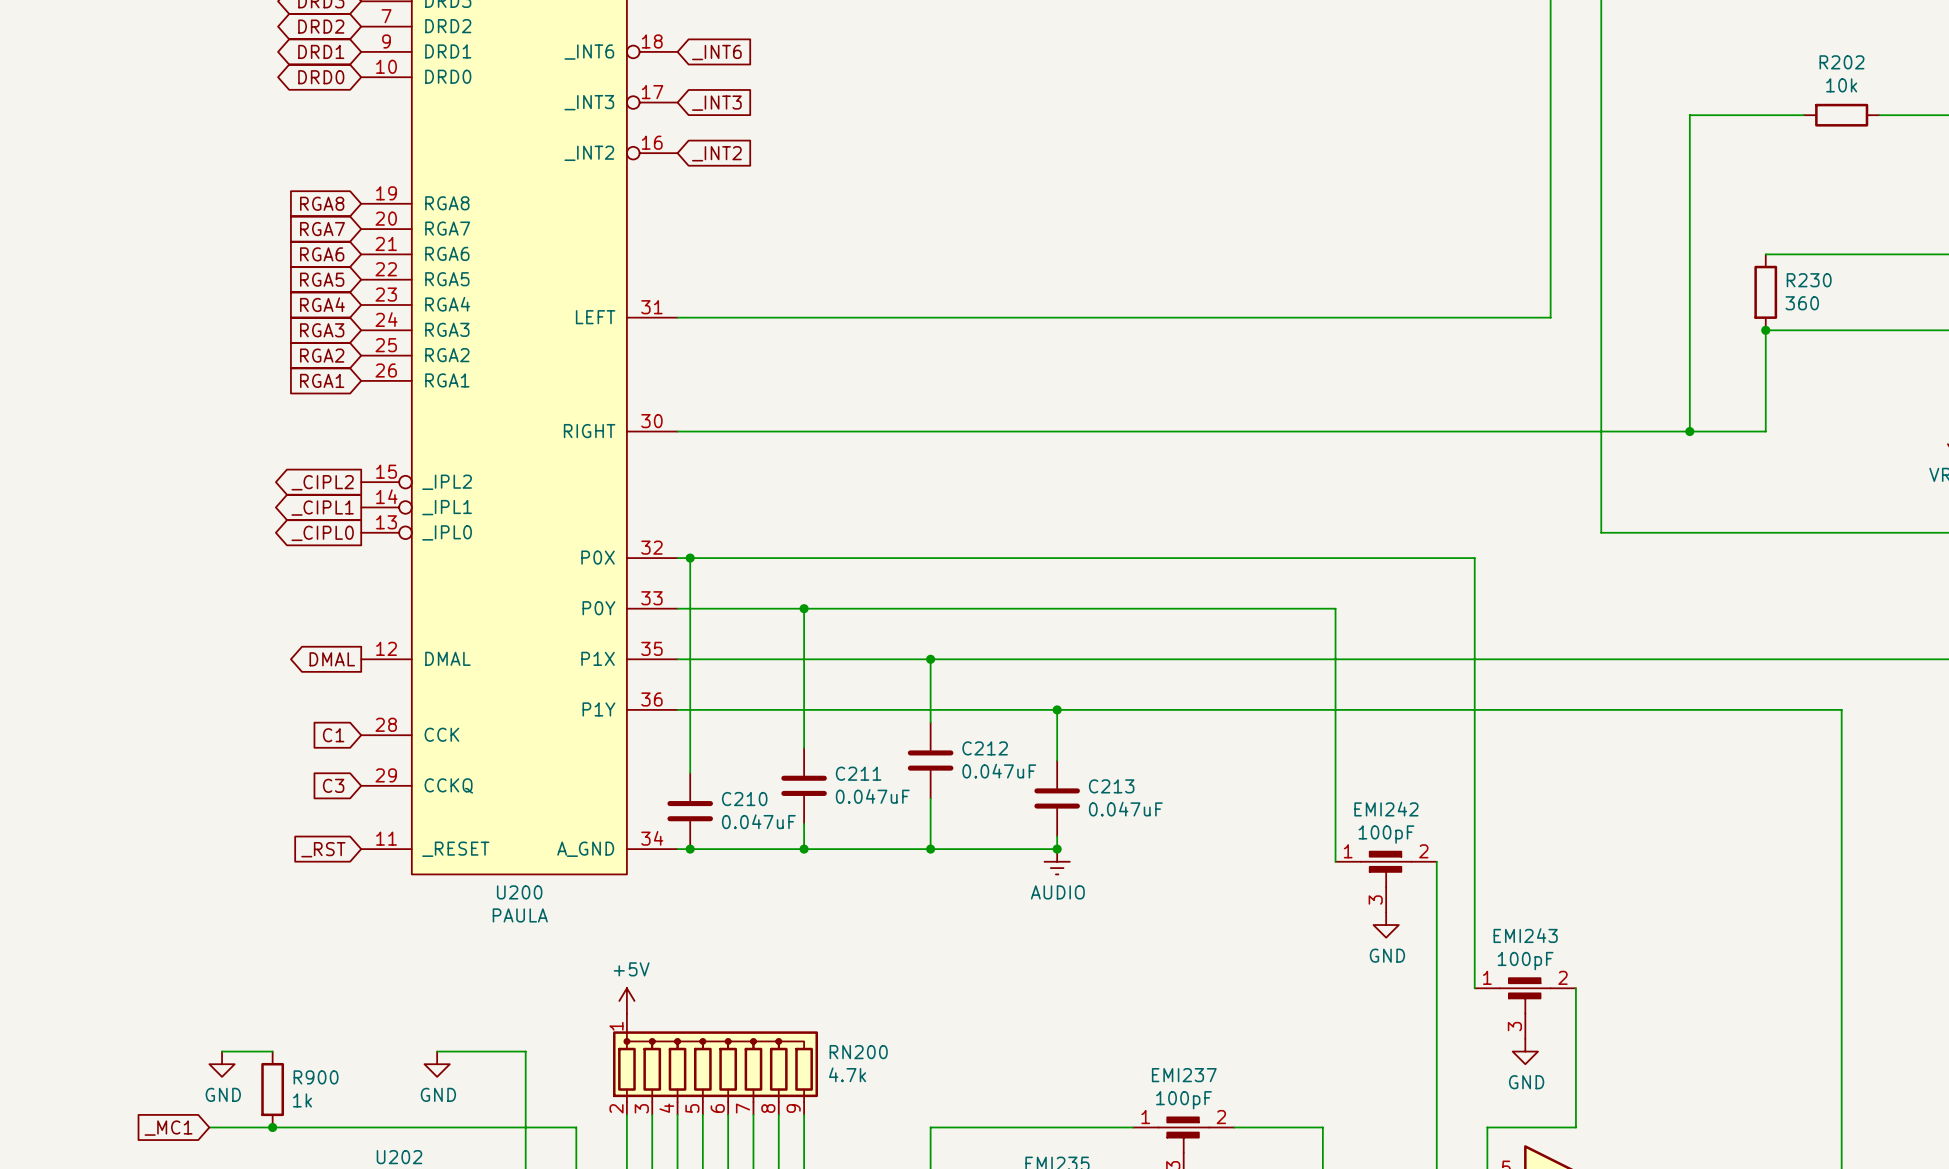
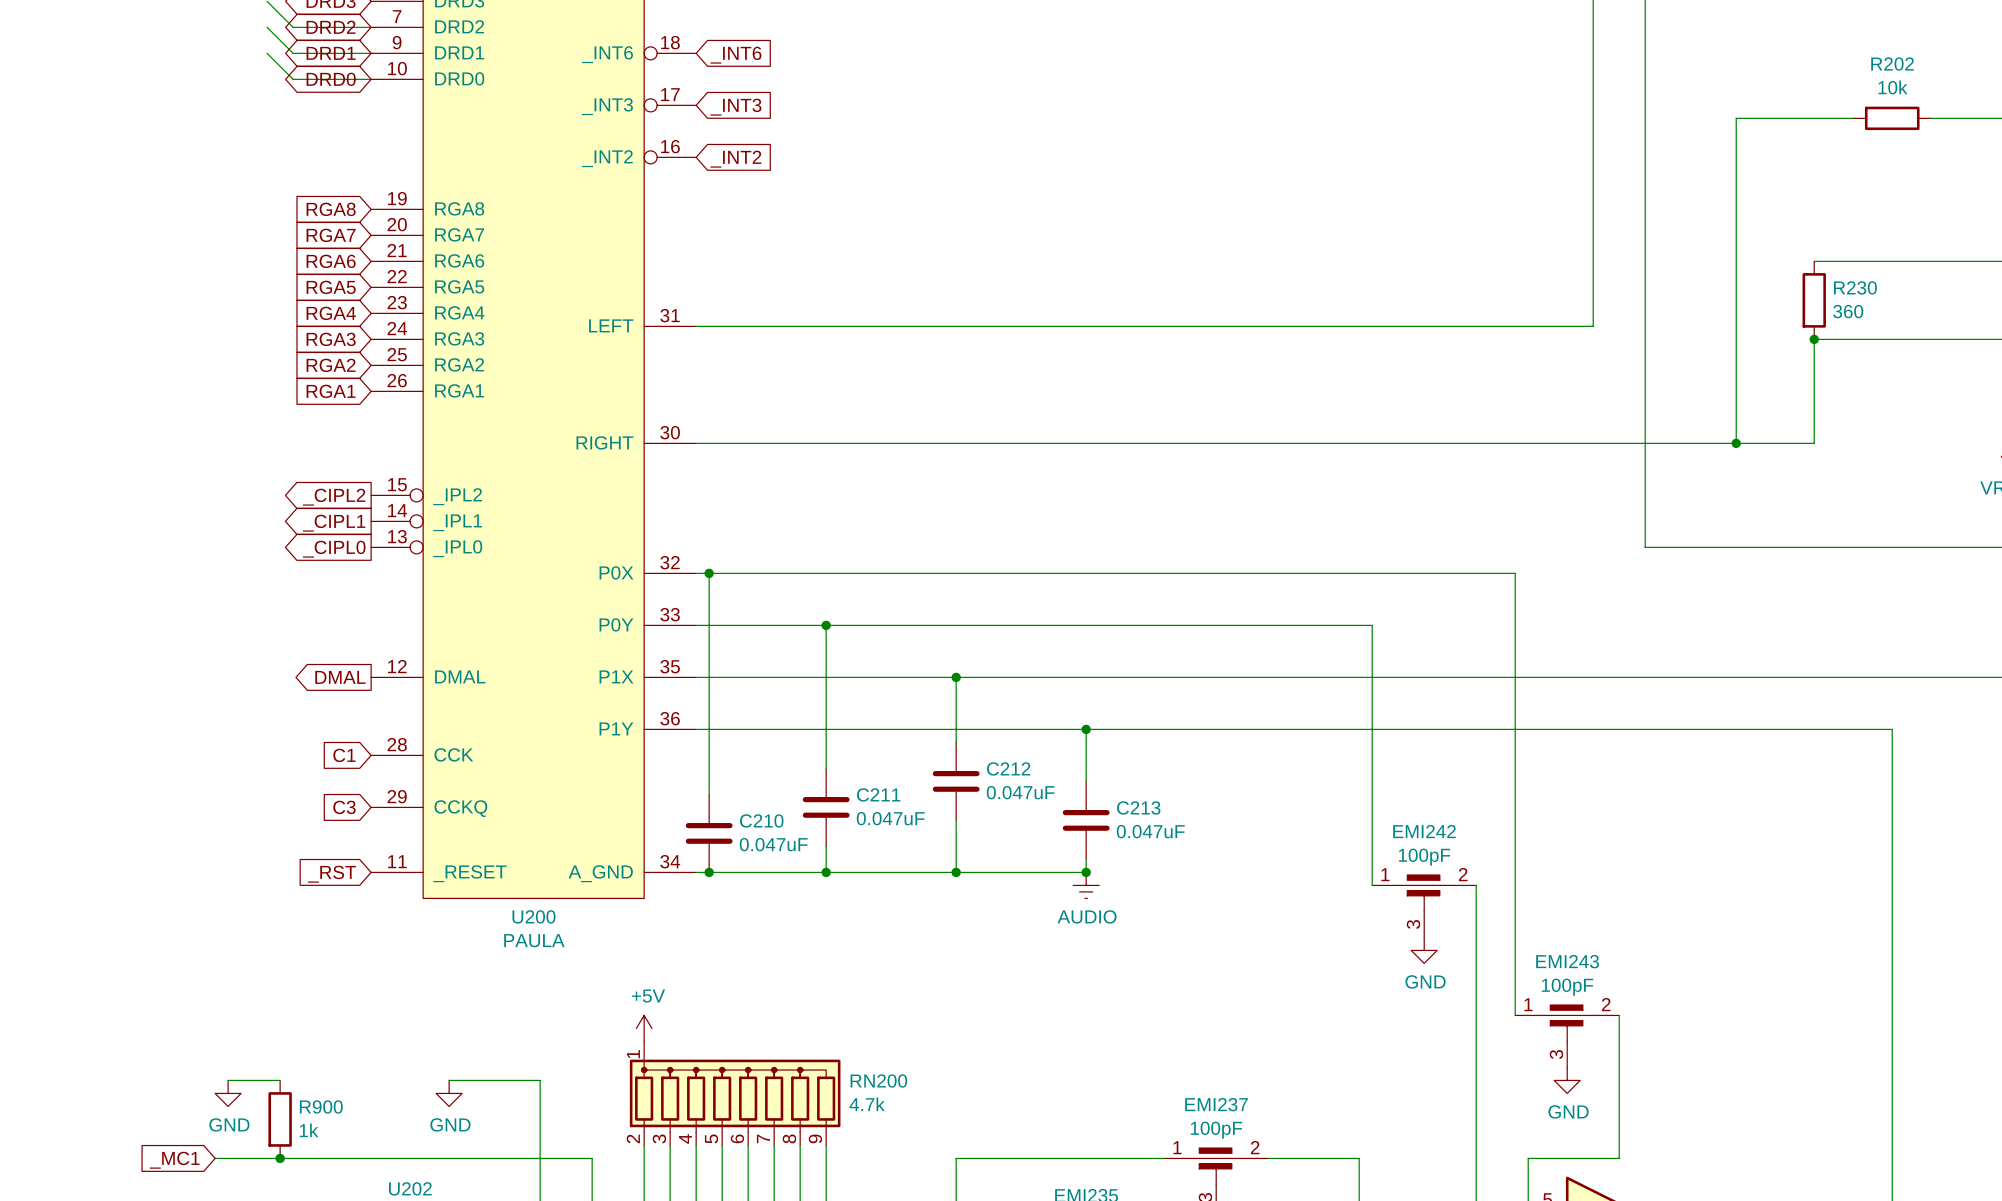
wire: none -> (267, 1) (293, 27) (371, 27)
wire: none -> (267, 27) (293, 53) (371, 53)
wire: none -> (267, 53) (293, 79) (371, 79)

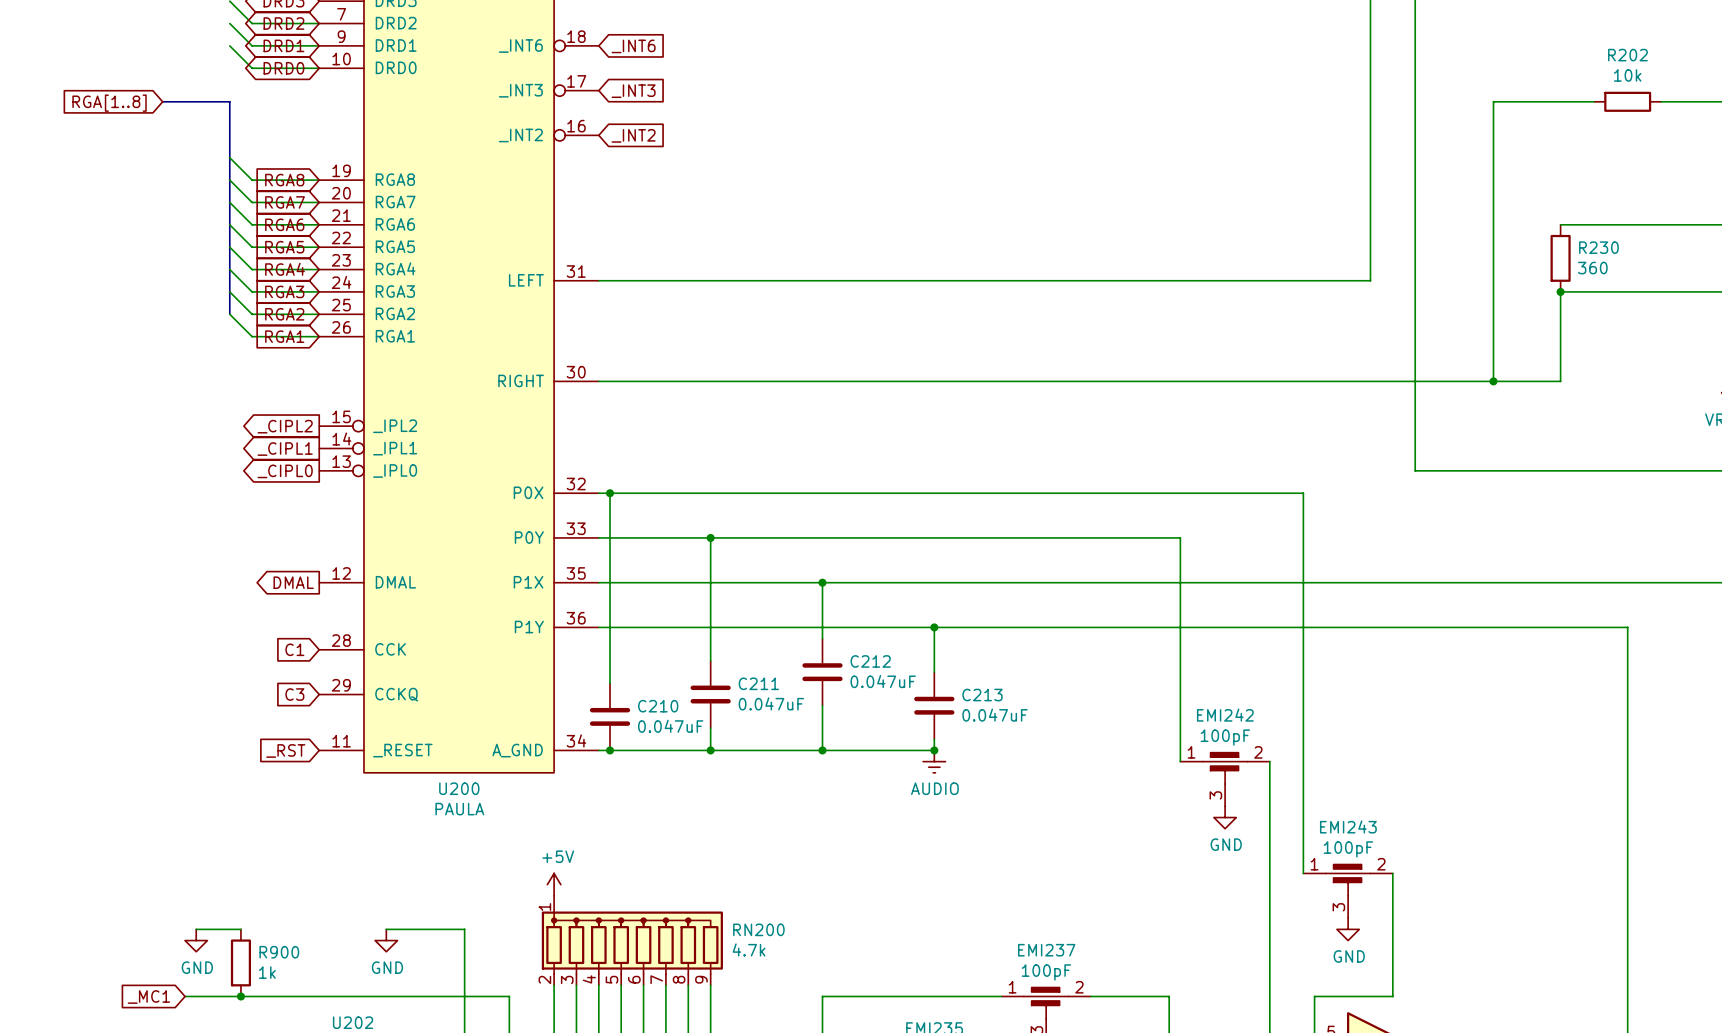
bus: none -> (162, 101) (229, 101) (229, 314)
global label: none -> RGA[1..8] (109, 103)
wire: none -> (229, 157) (252, 180) (319, 180)
wire: none -> (229, 180) (252, 202) (319, 202)
wire: none -> (229, 202) (252, 224) (319, 224)
wire: none -> (229, 224) (252, 247) (319, 247)
wire: none -> (229, 247) (252, 269) (319, 269)
wire: none -> (229, 269) (252, 291) (319, 291)
wire: none -> (229, 291) (252, 314) (319, 314)
wire: none -> (229, 314) (252, 336) (319, 336)

